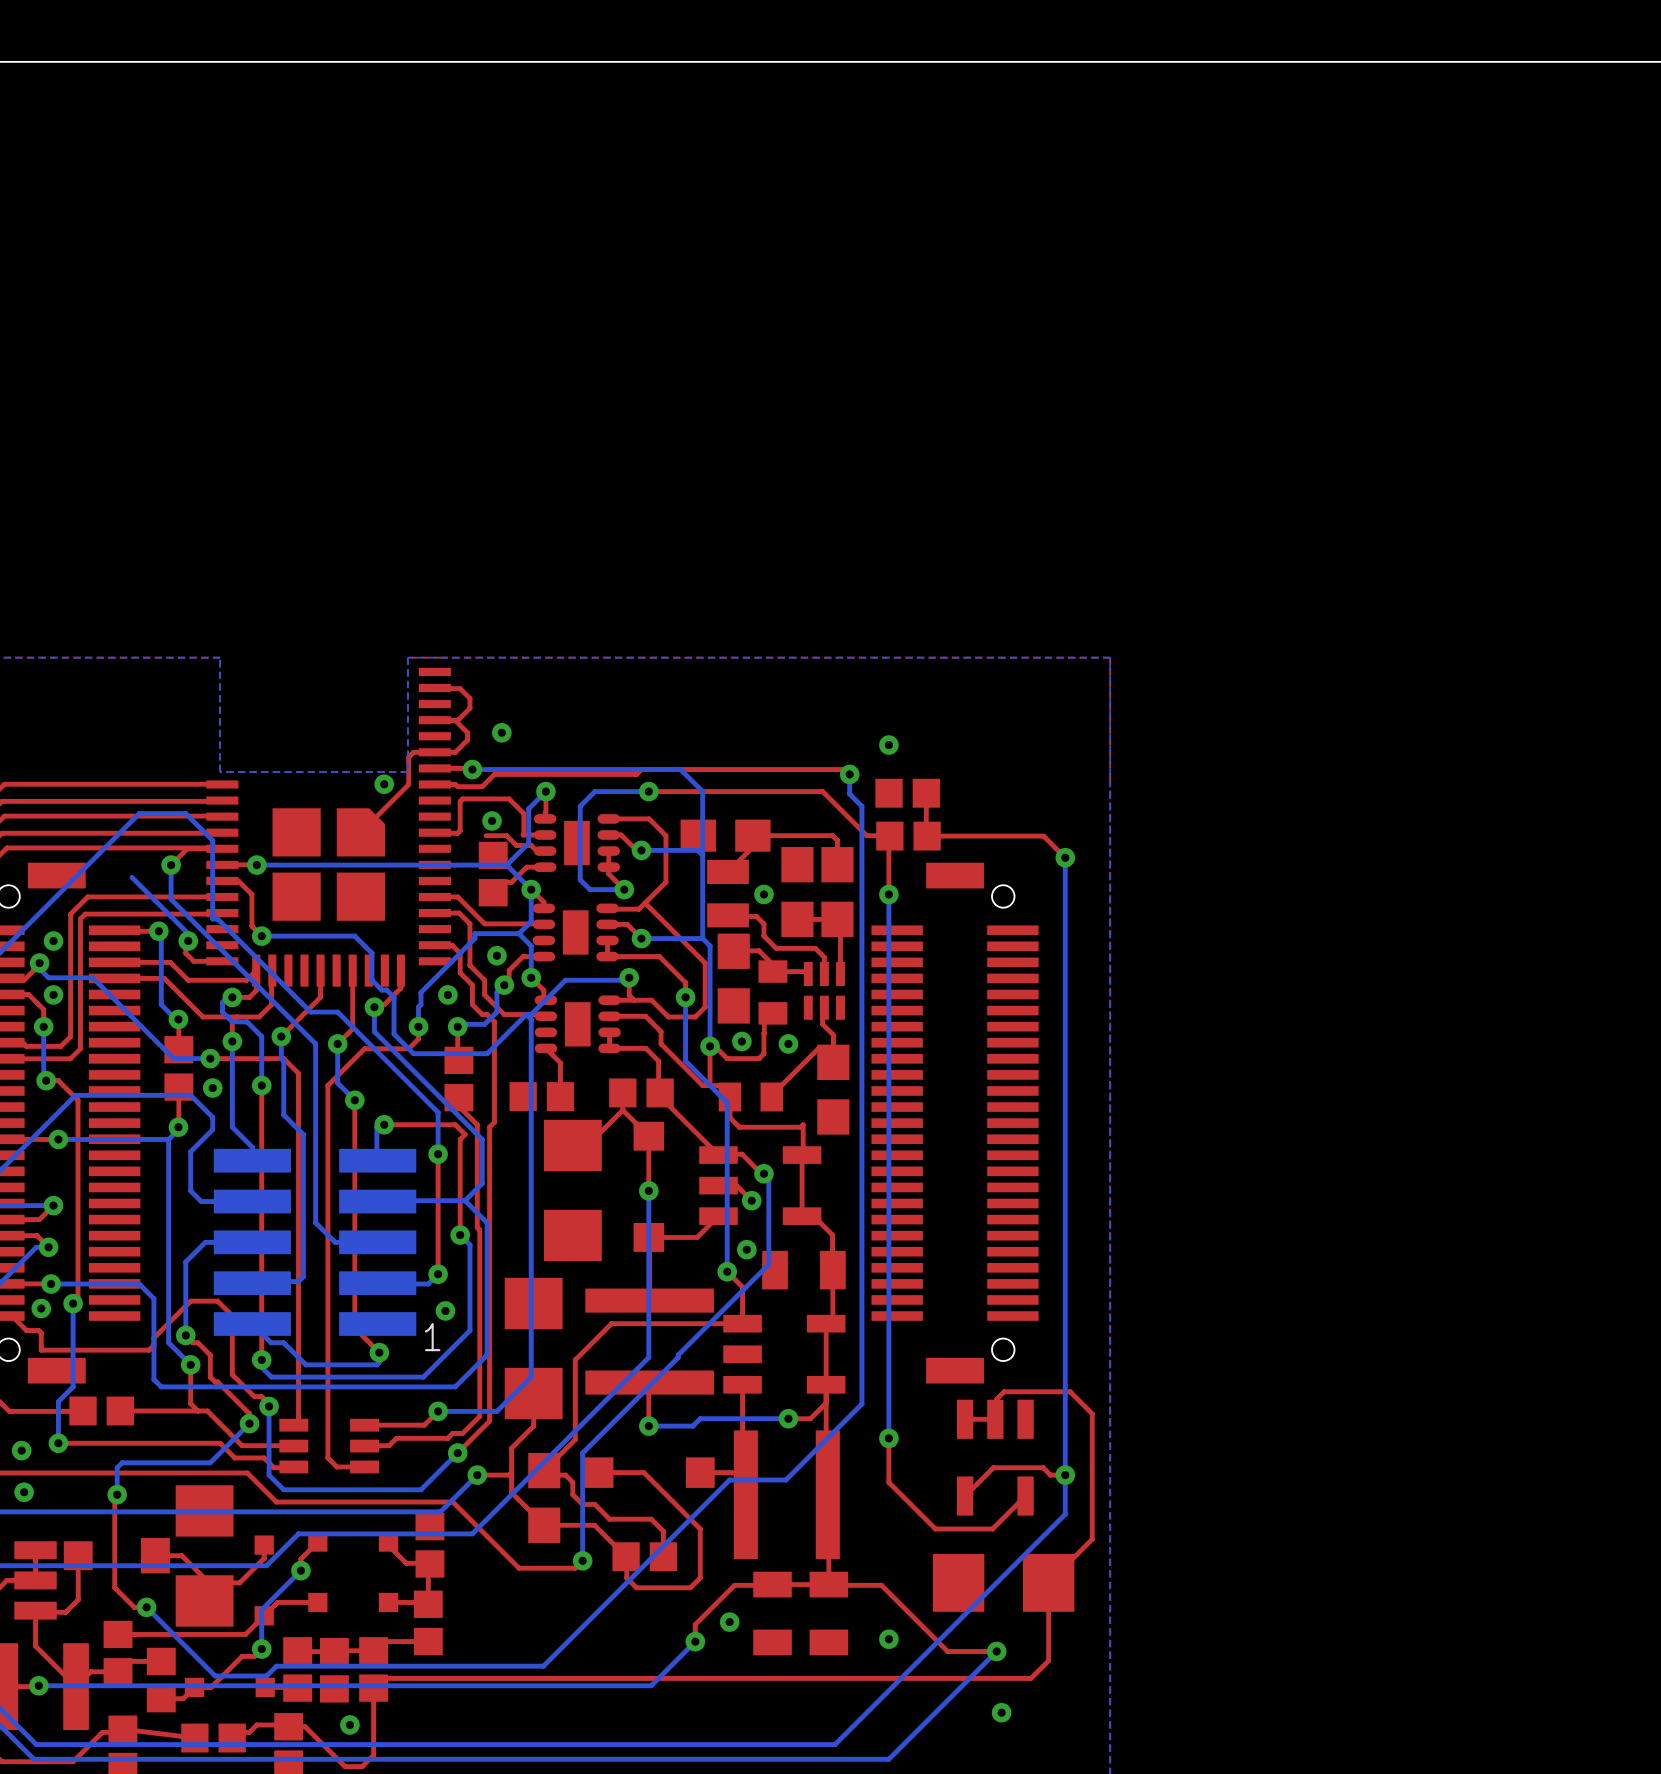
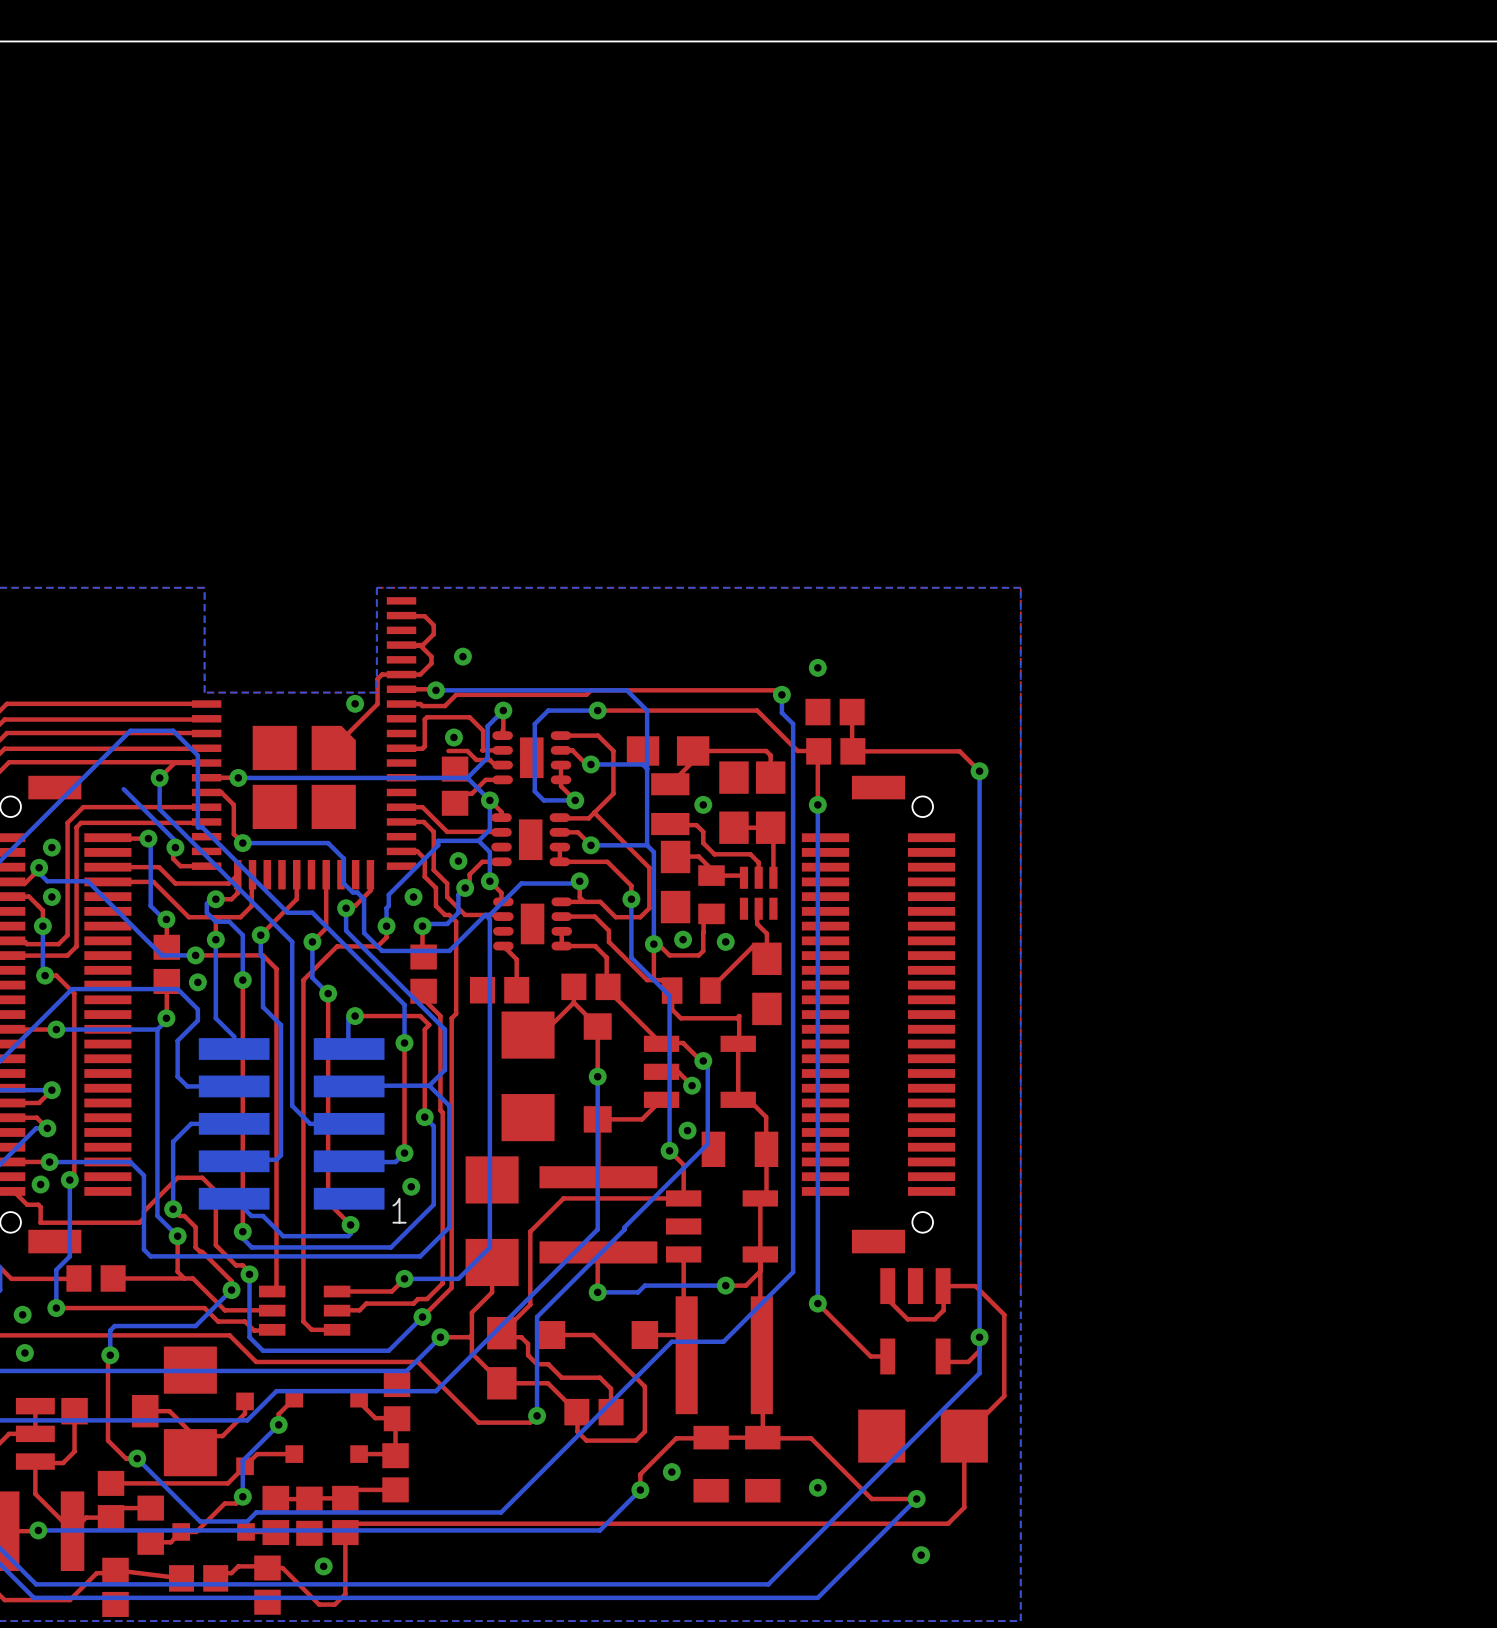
top track: (965, 1419) (995, 1419) (996, 1399) (1004, 1391) (1070, 1391) (1092, 1413) (1092, 1450) -> (887, 1299) (907, 1319) (934, 1319) (943, 1310) (943, 1286) (975, 1286) (1004, 1314)
top track: (888, 1438) (888, 1482) (935, 1528) (992, 1528) (1025, 1496) -> (817, 1303) (870, 1356) (887, 1356)
top track: (1065, 1475) (1050, 1475) (1043, 1467) (993, 1467) (965, 1496) -> (979, 1337) (979, 1350) (968, 1361) (948, 1361) (943, 1356)

